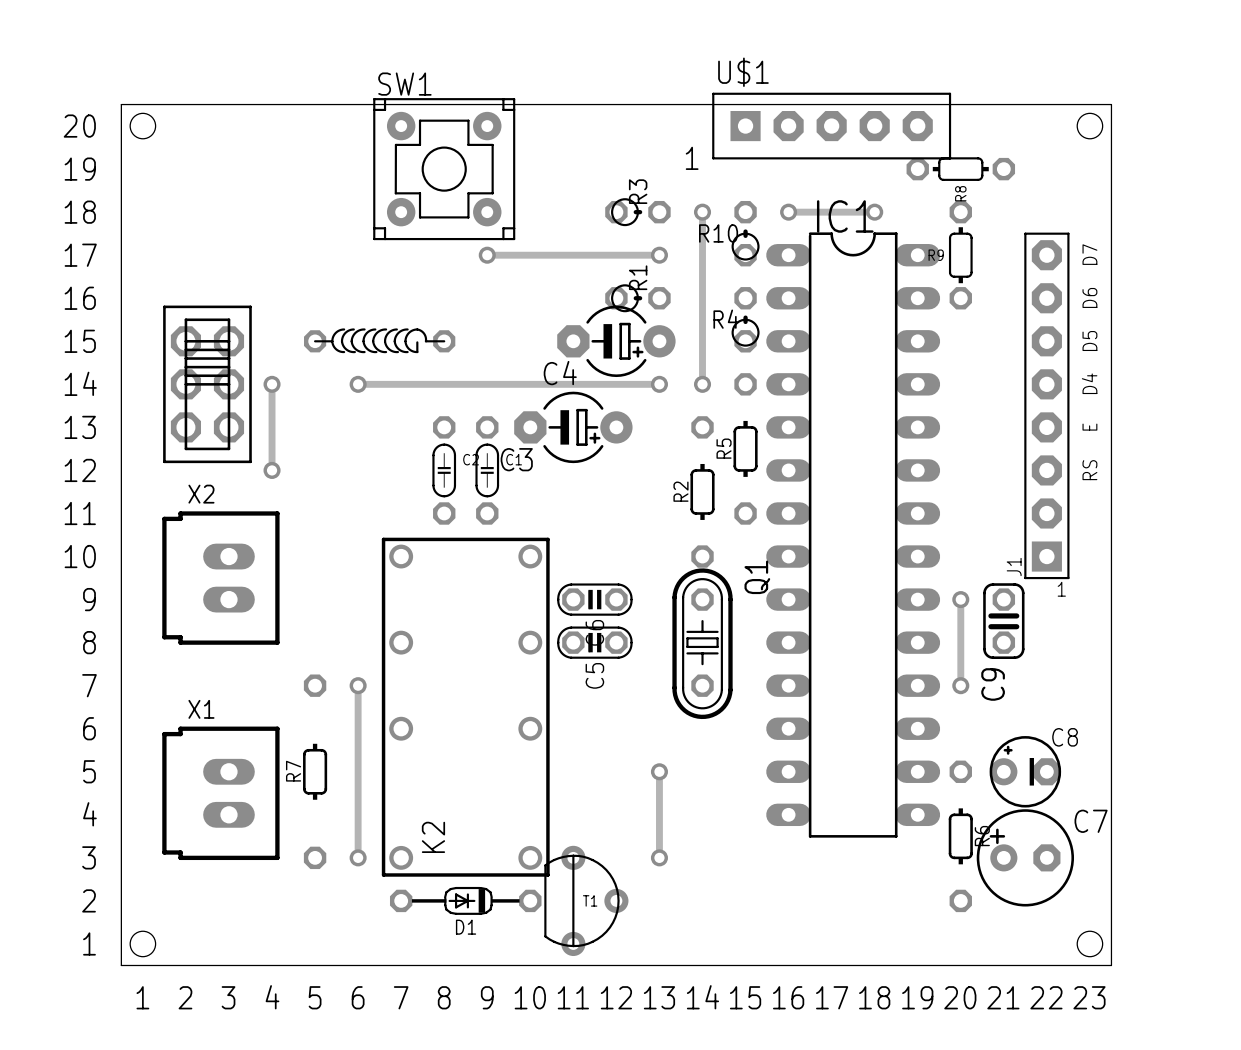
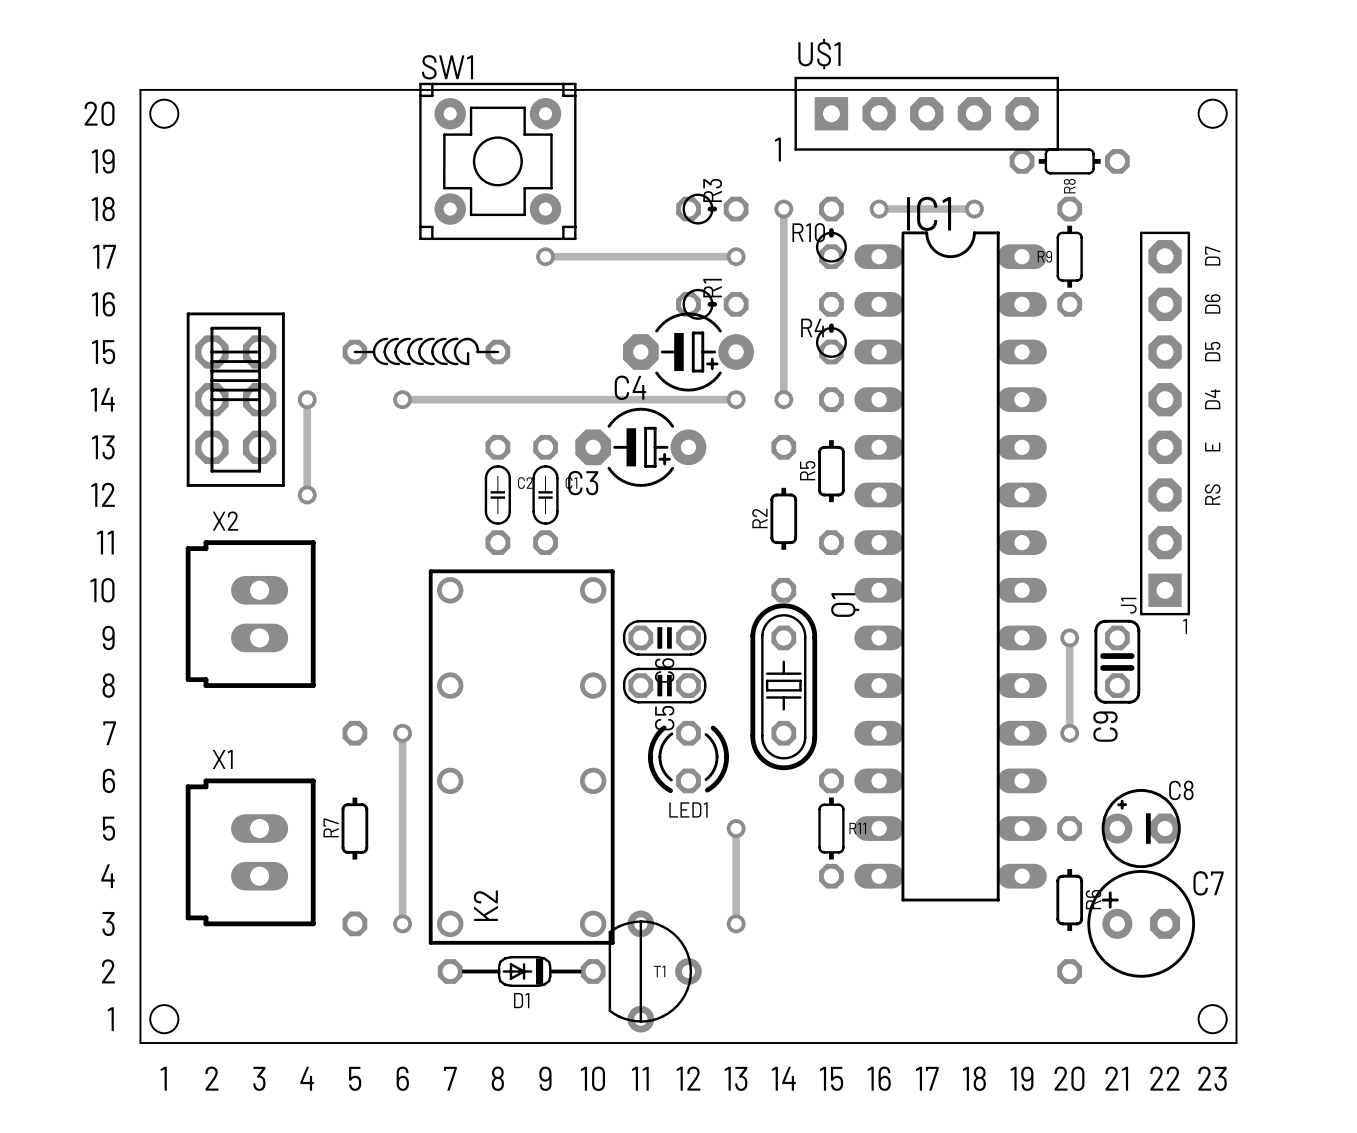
LED1: none -> (688, 757)
R11: none -> (831, 828)

